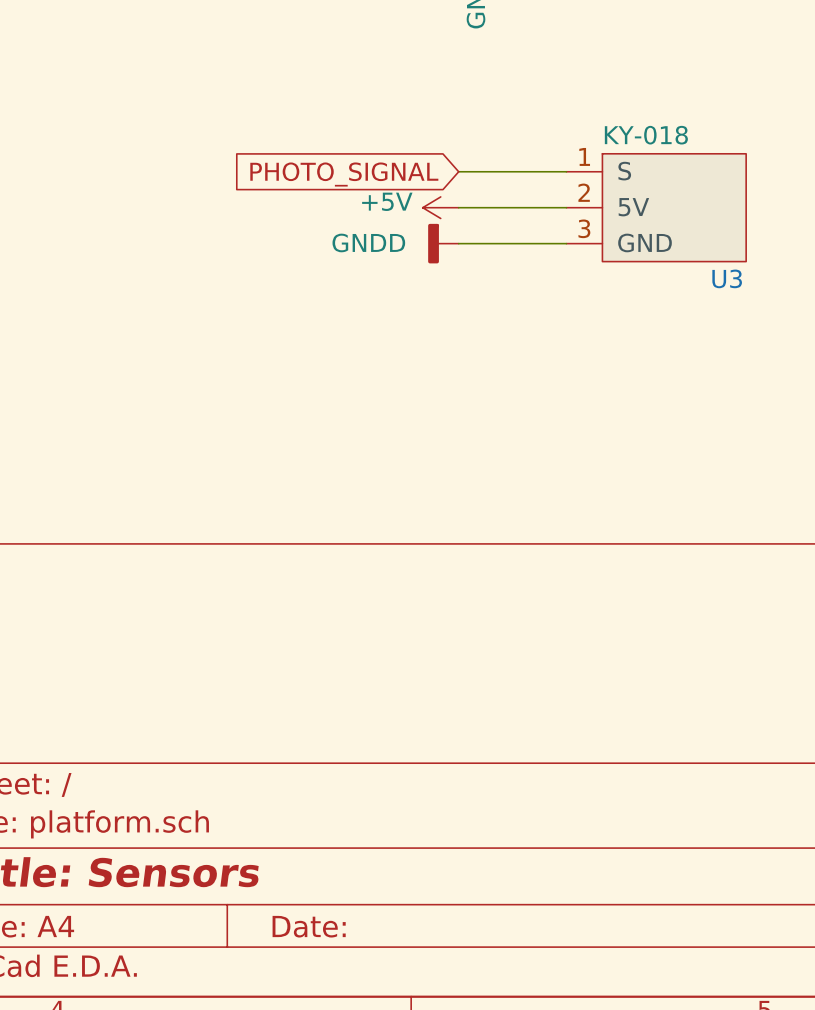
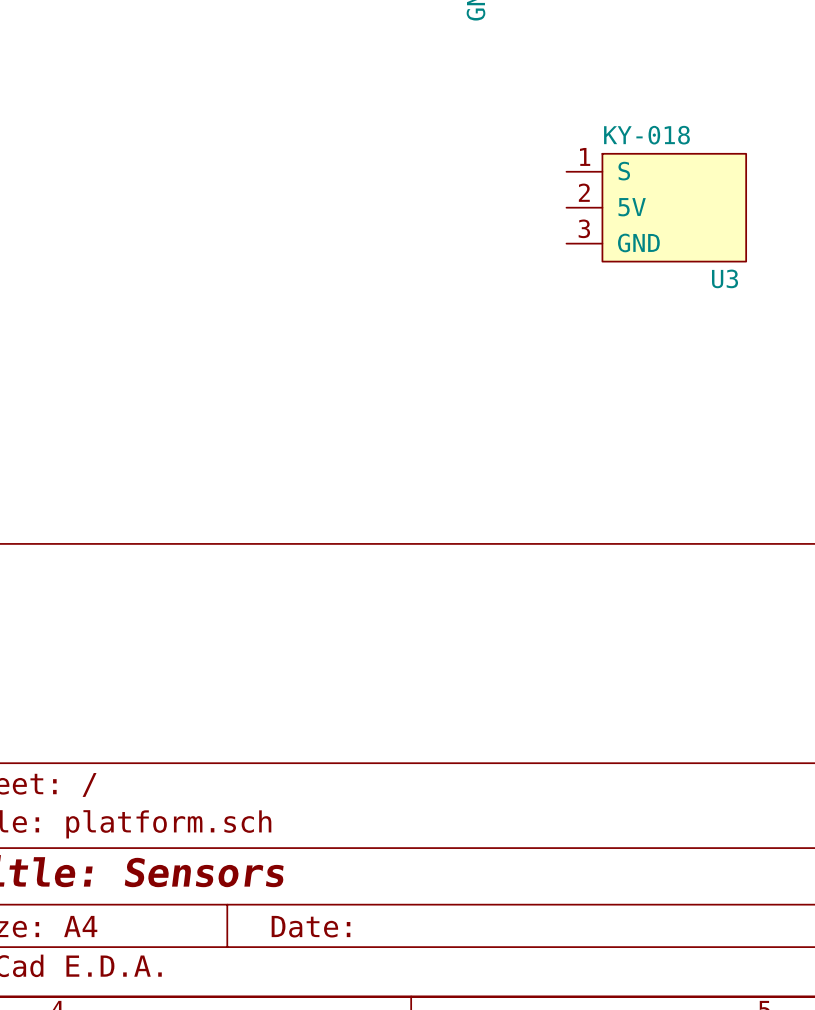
wire: (458, 171) (566, 171) -> none
global label: PHOTO_SIGNAL (344, 174) -> none
power symbol: +5V (440, 207) -> none
wire: (458, 207) (566, 207) -> none
power symbol: GNDD (443, 243) -> none
wire: (458, 243) (566, 243) -> none

